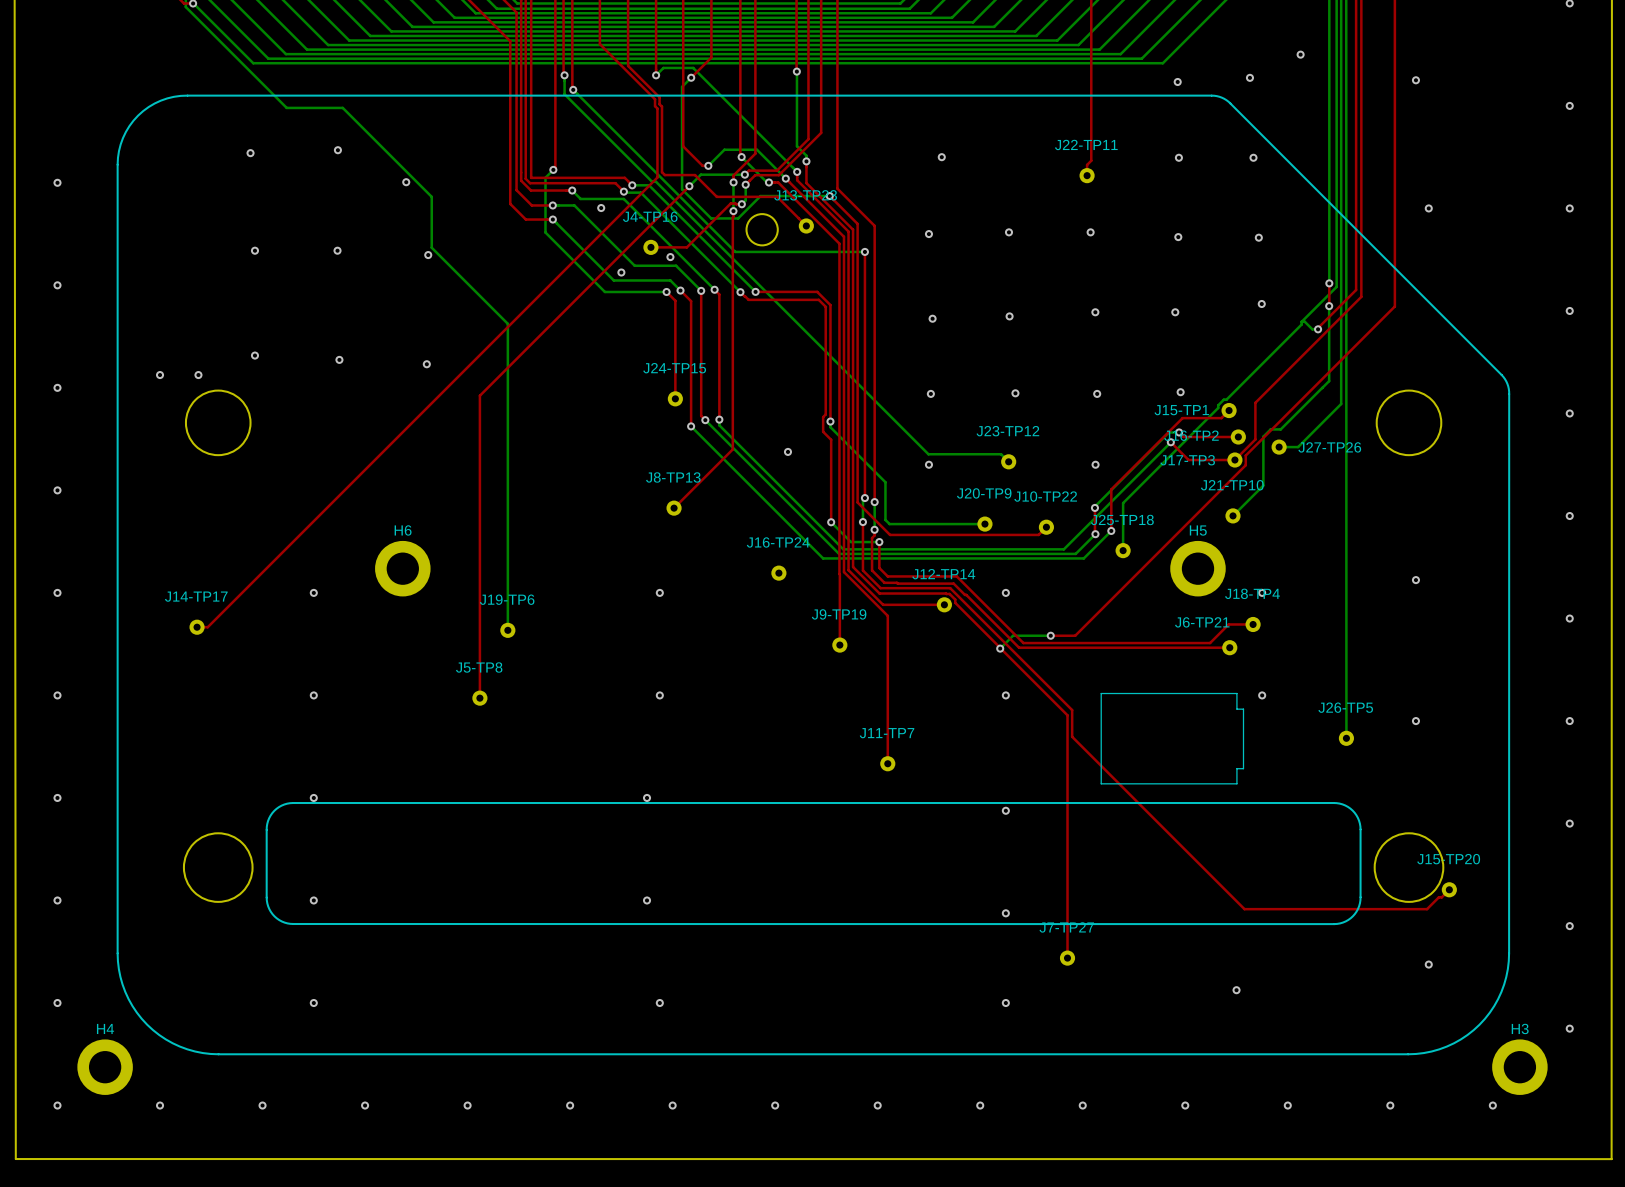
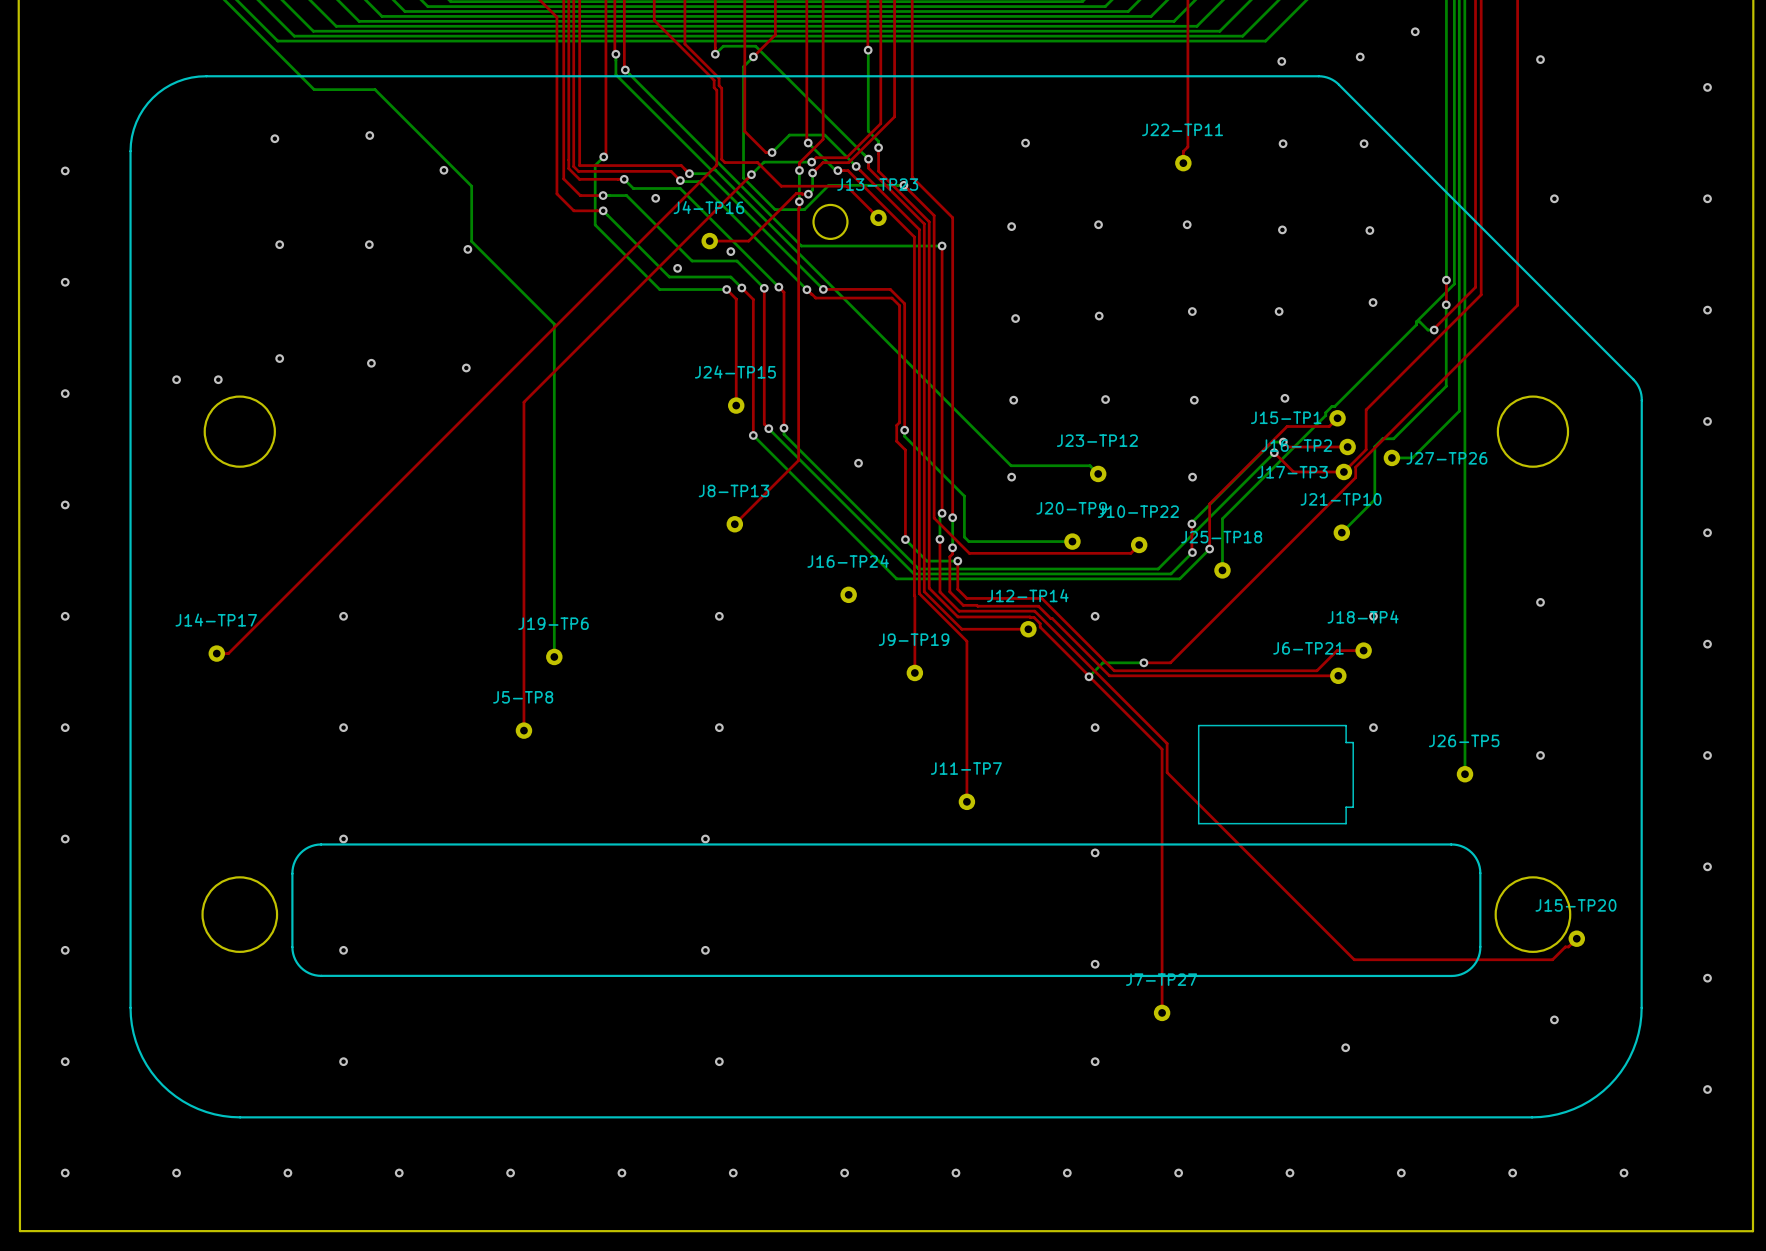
H6: (402, 568) -> none
H5: (1197, 568) -> none
H4: (105, 1067) -> none
H3: (1519, 1067) -> none

